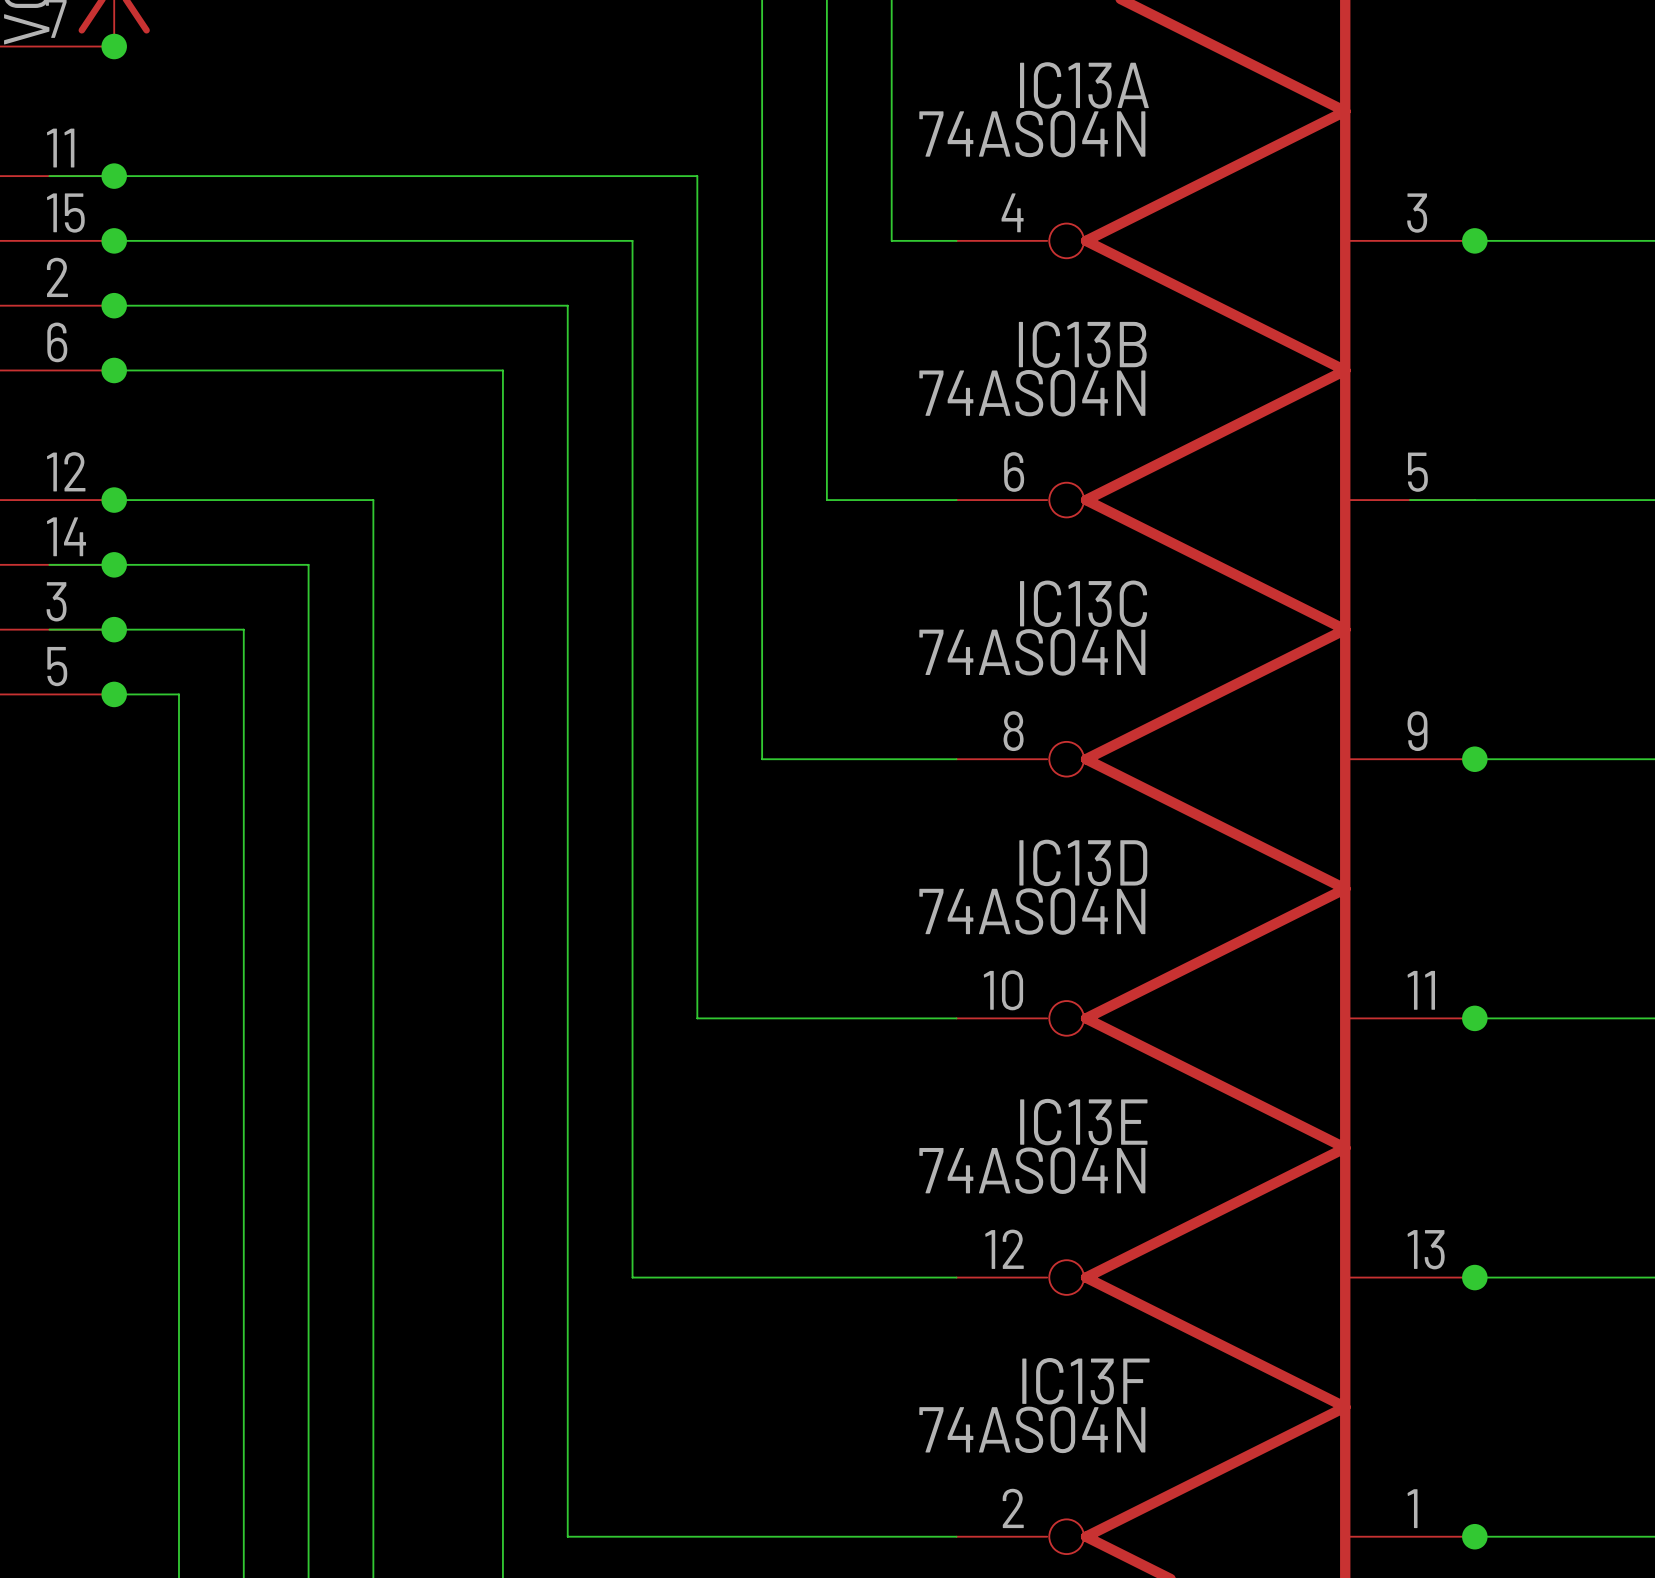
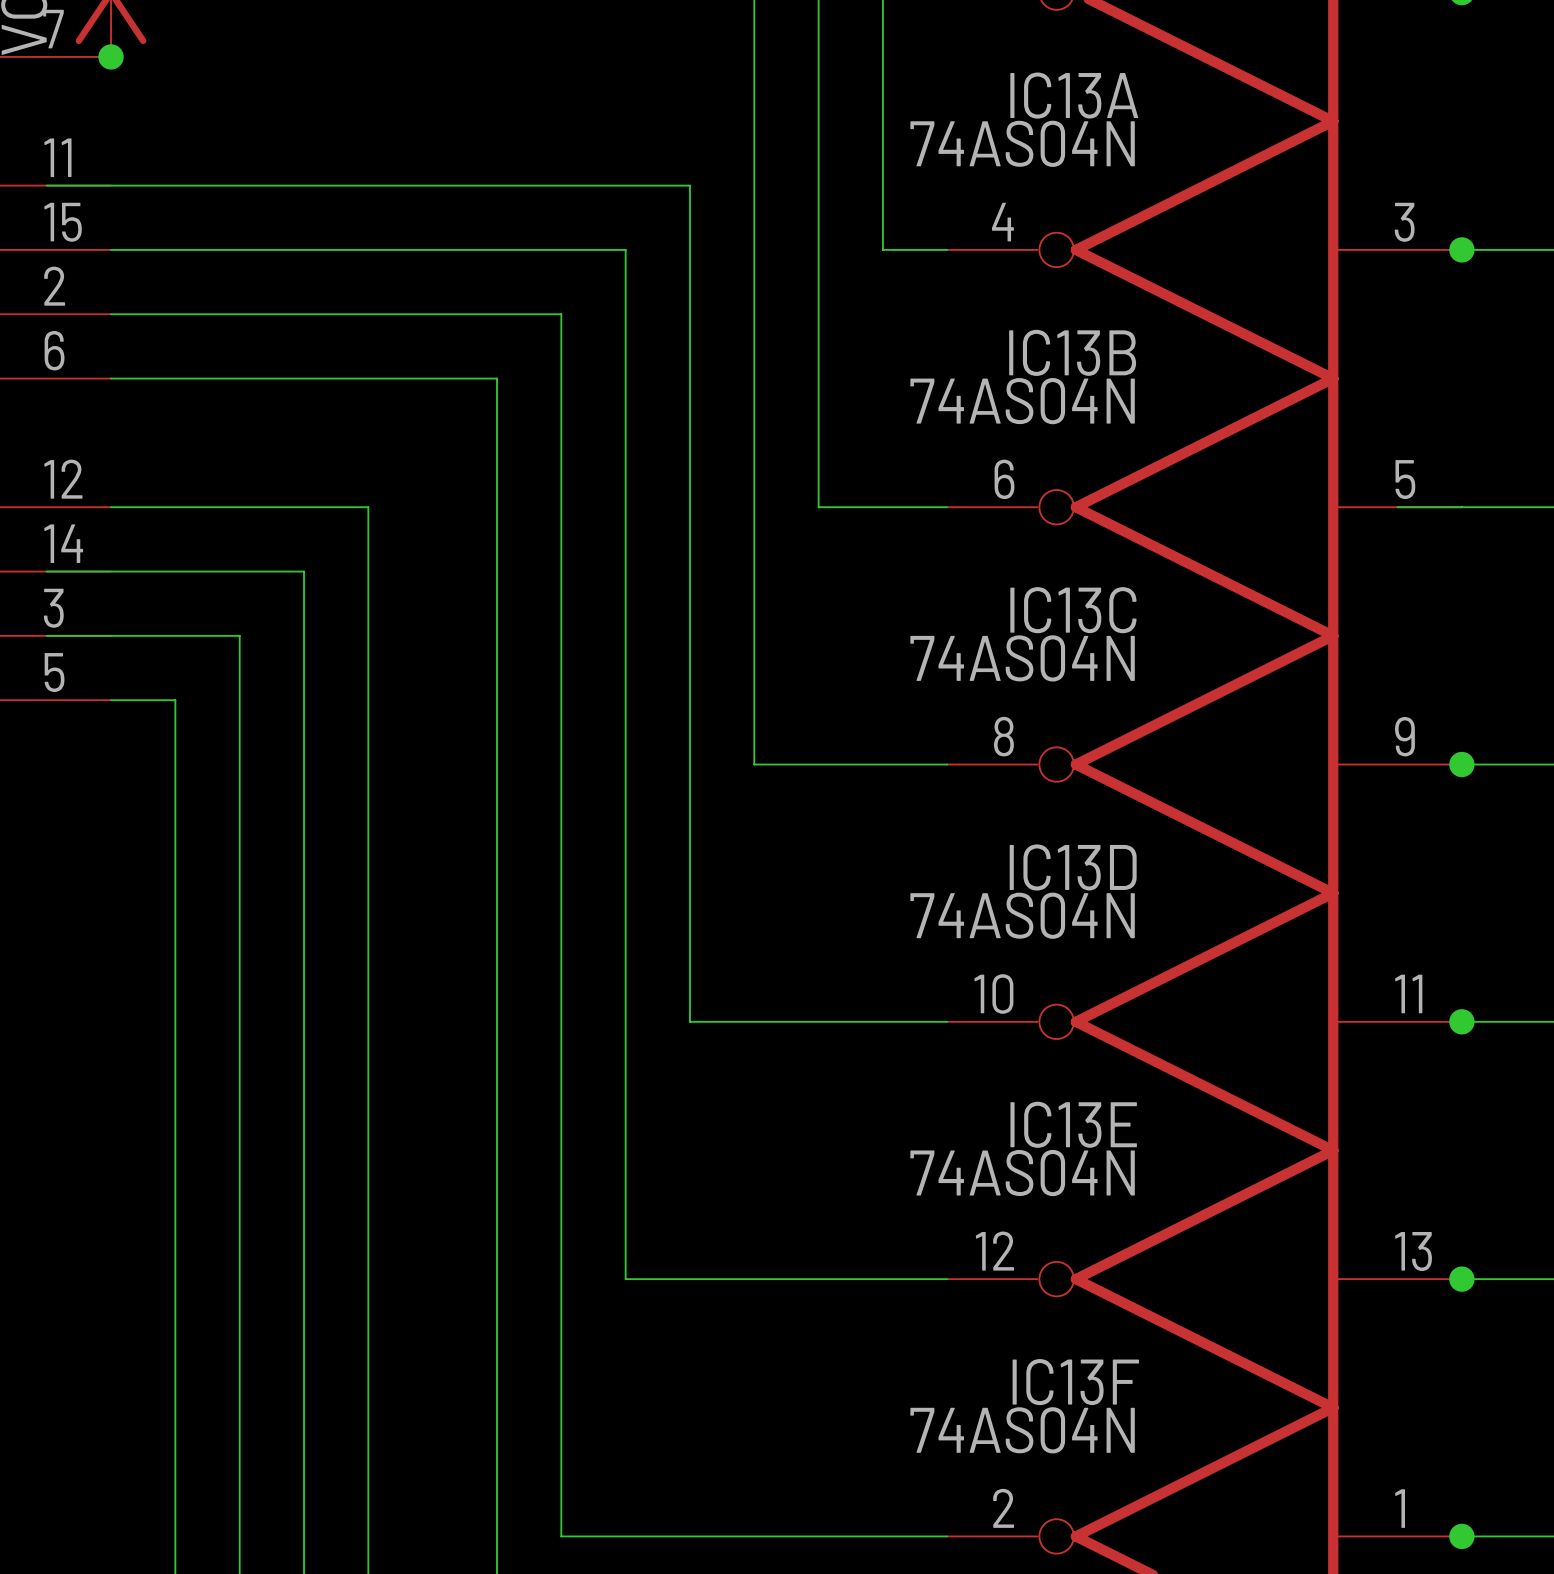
junction: (114, 176) -> none
junction: (114, 240) -> none
junction: (114, 305) -> none
junction: (114, 370) -> none
junction: (114, 500) -> none
junction: (114, 564) -> none
junction: (114, 629) -> none
junction: (114, 694) -> none

